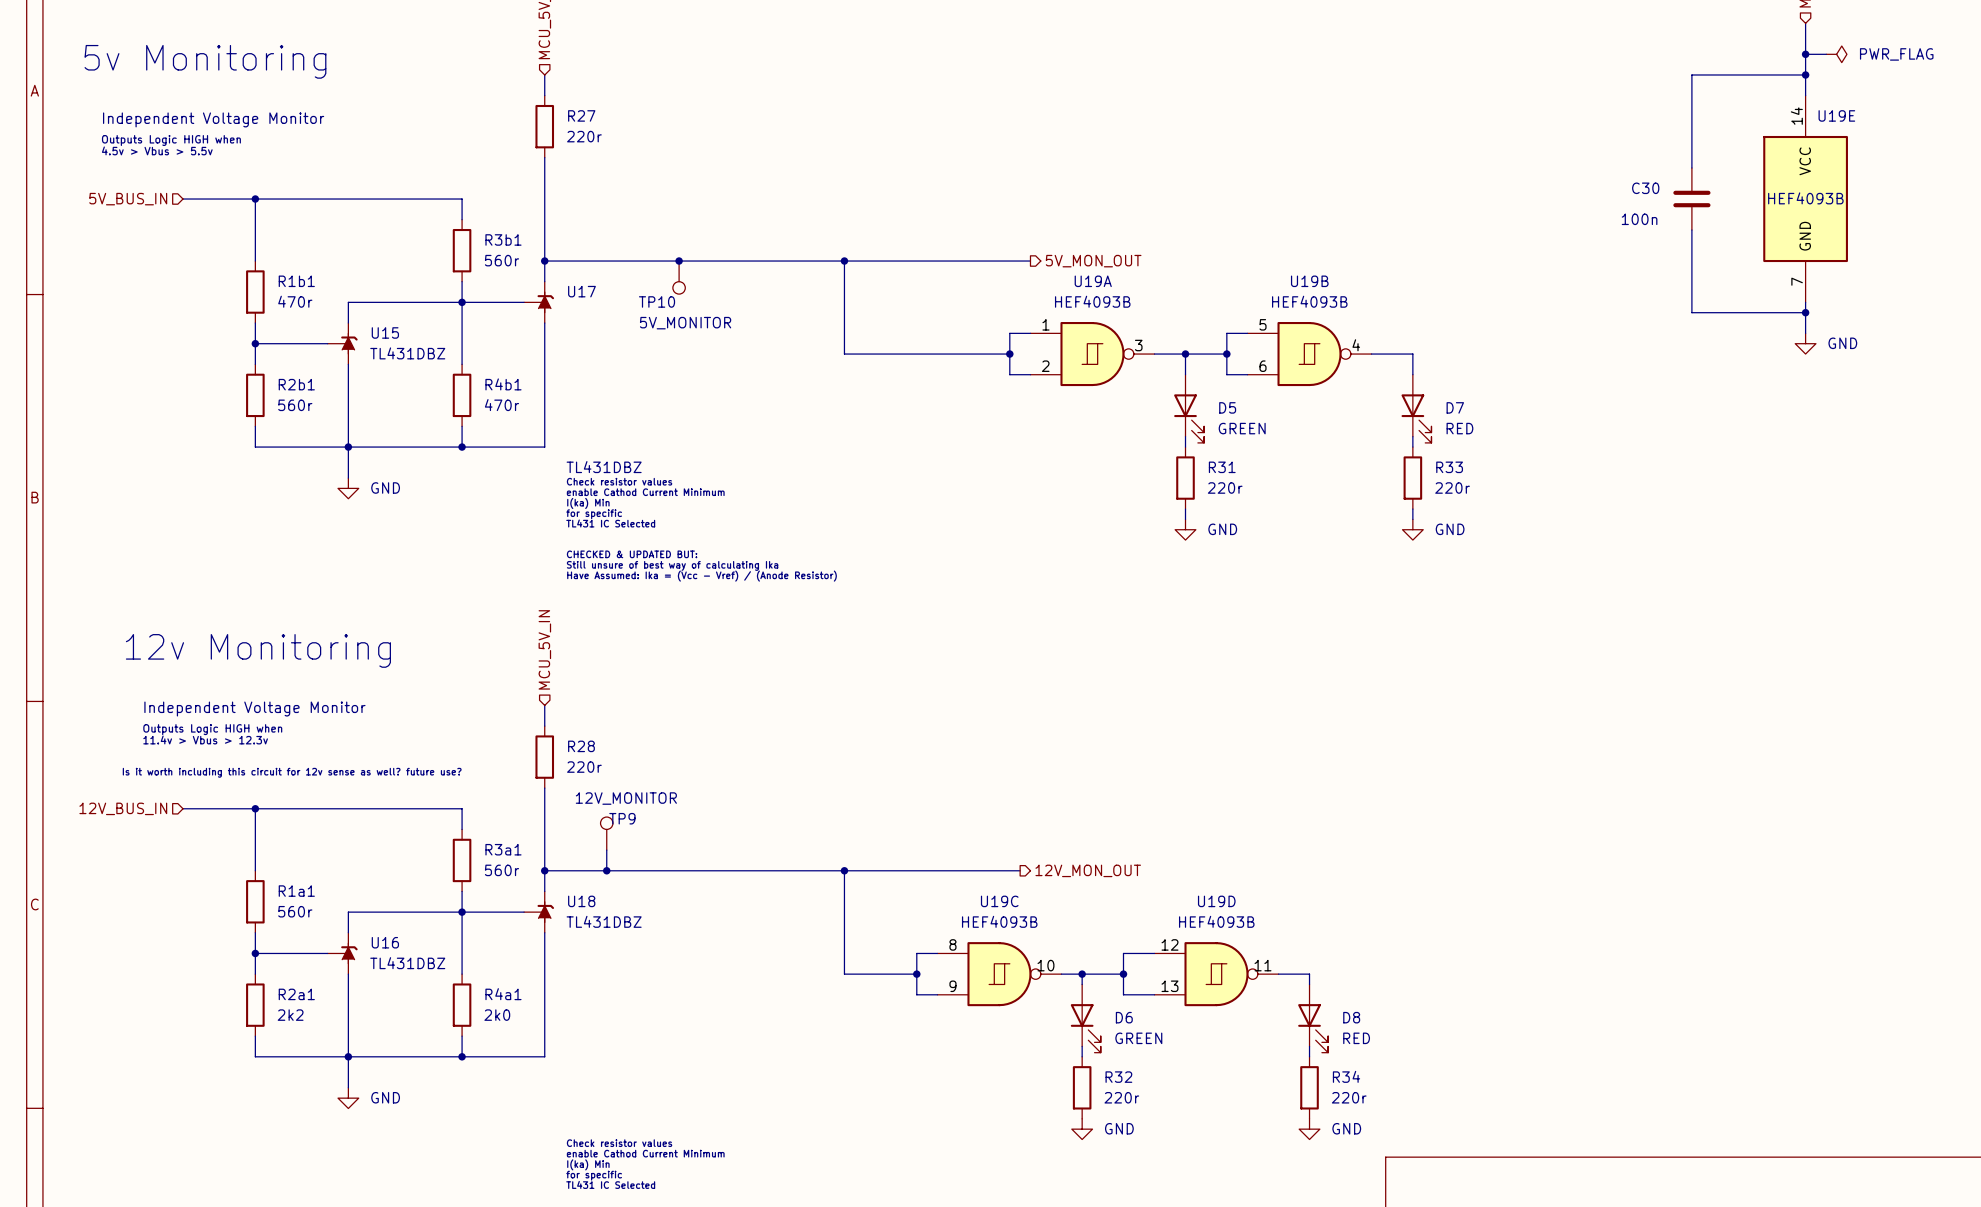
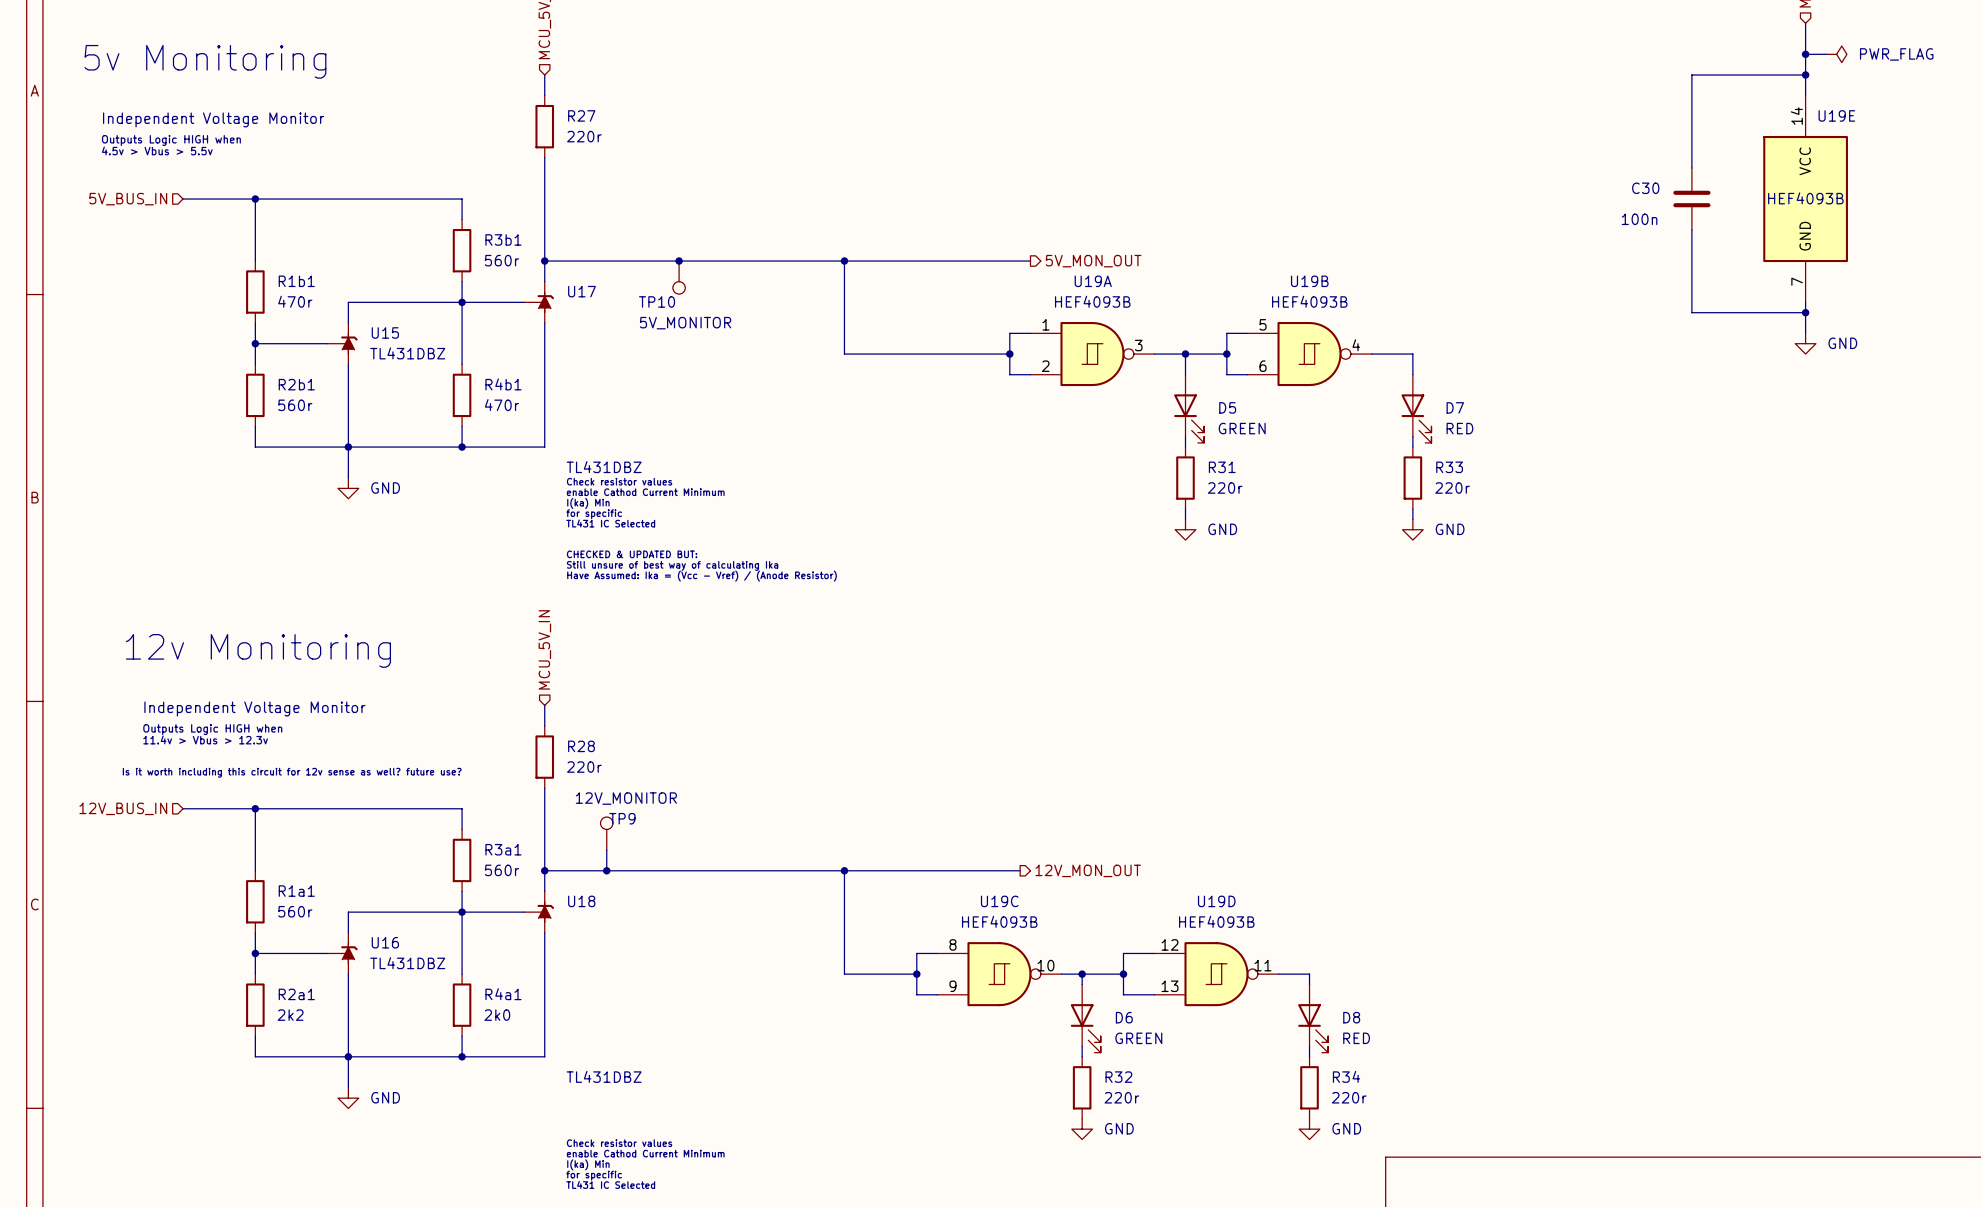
U18 value position: TL431DBZ (604, 921) -> TL431DBZ (604, 1076)

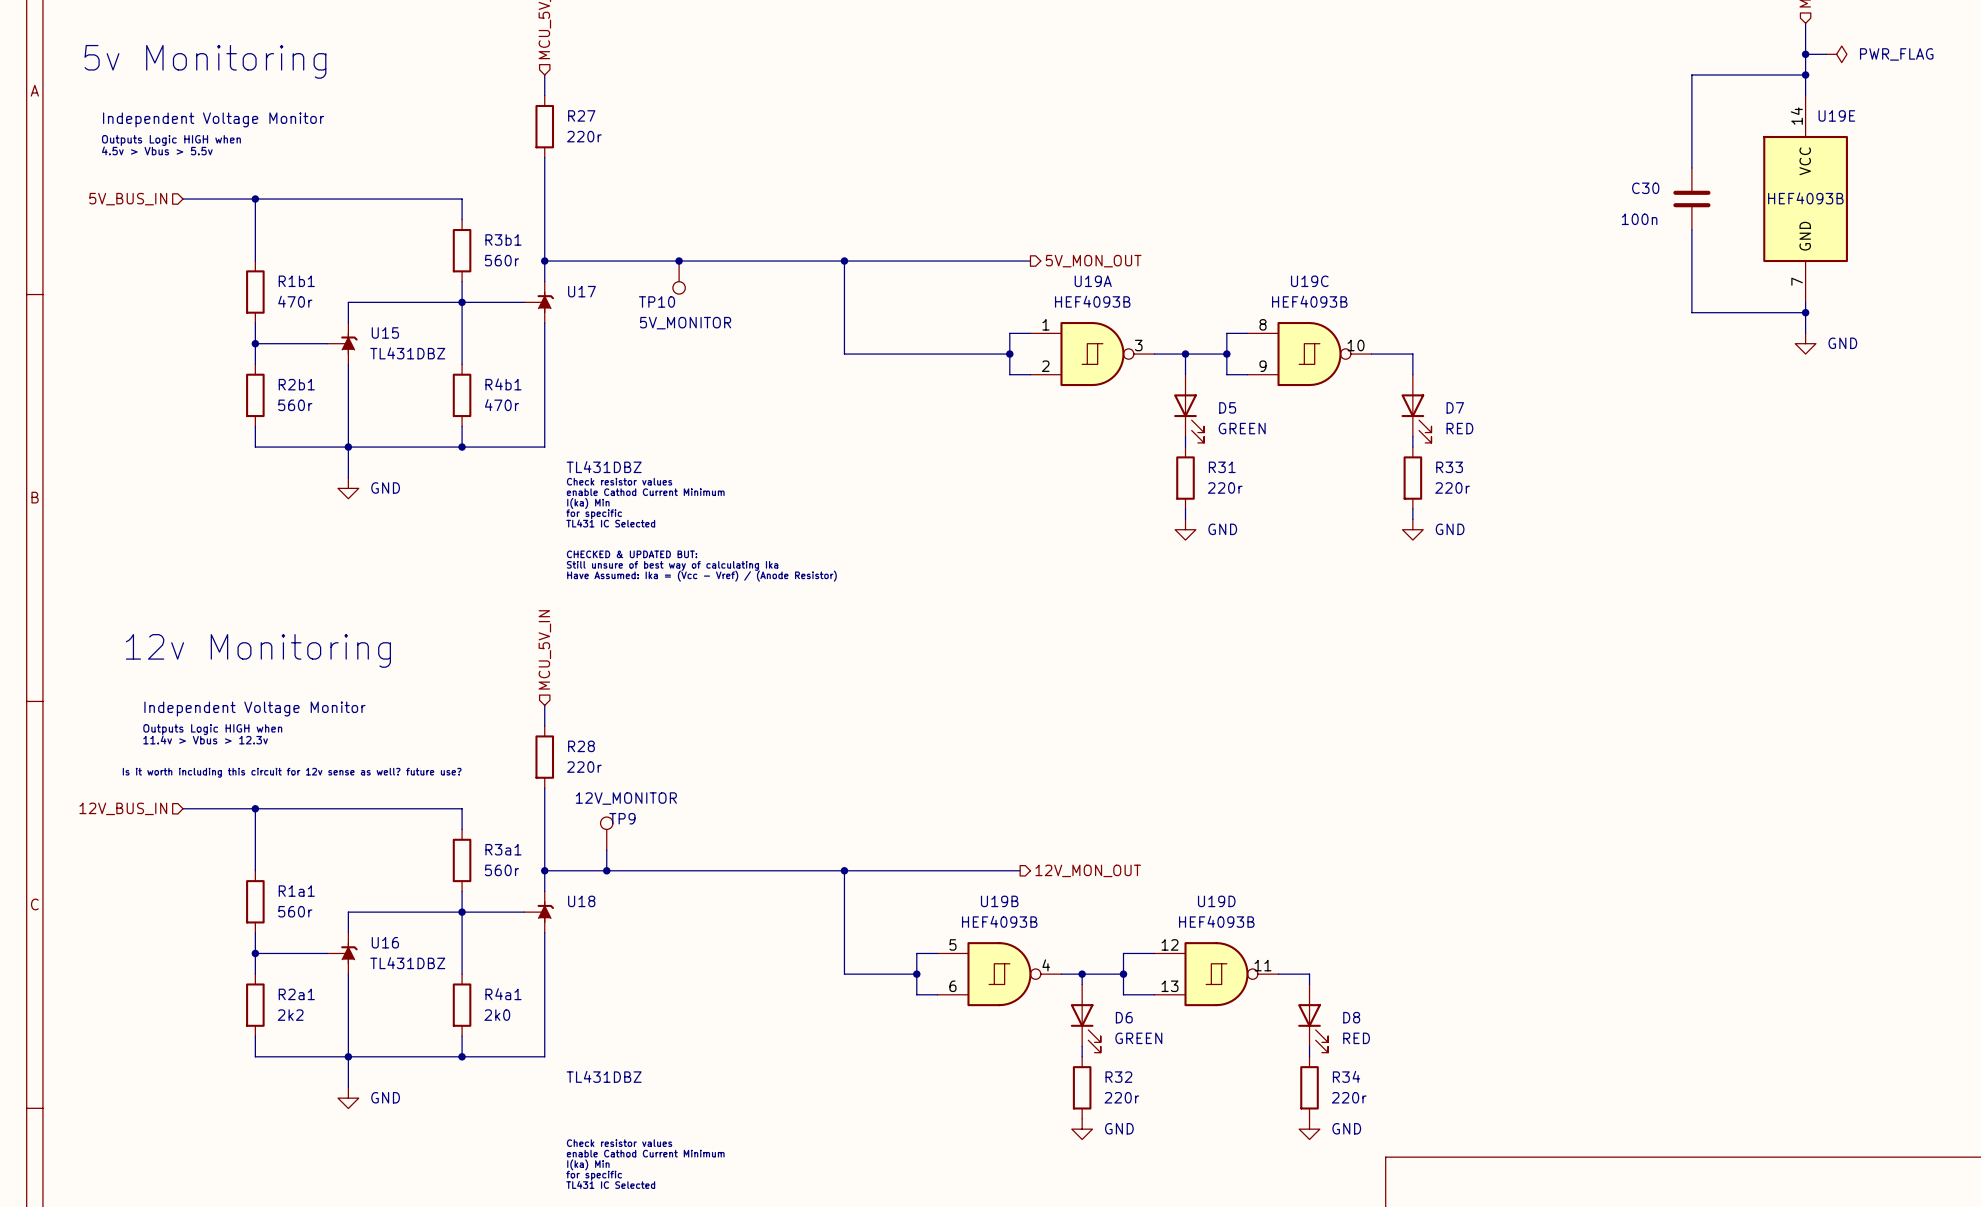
U19B position: (1309, 354) -> (999, 974)
U19C position: (999, 974) -> (1309, 354)

